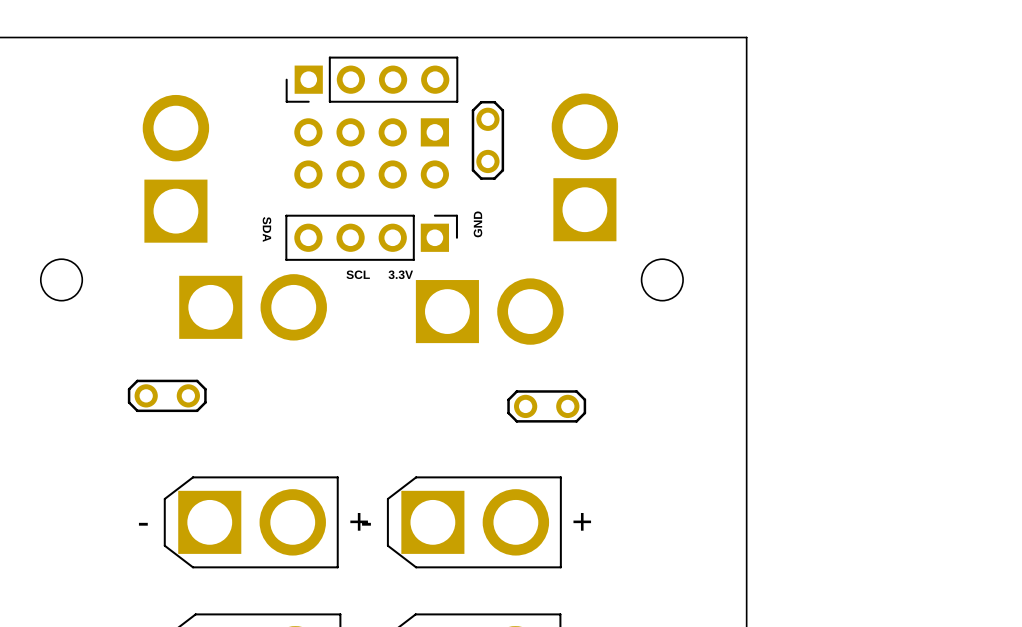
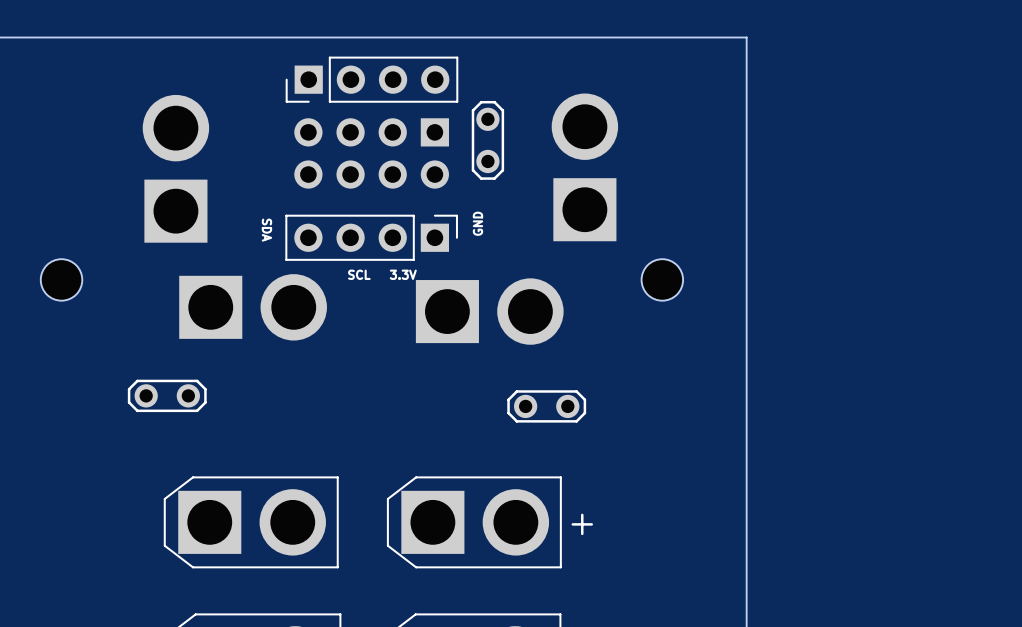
part text: + (359, 521) -> none
part text: - (143, 524) -> none
part text: - (366, 524) -> none

